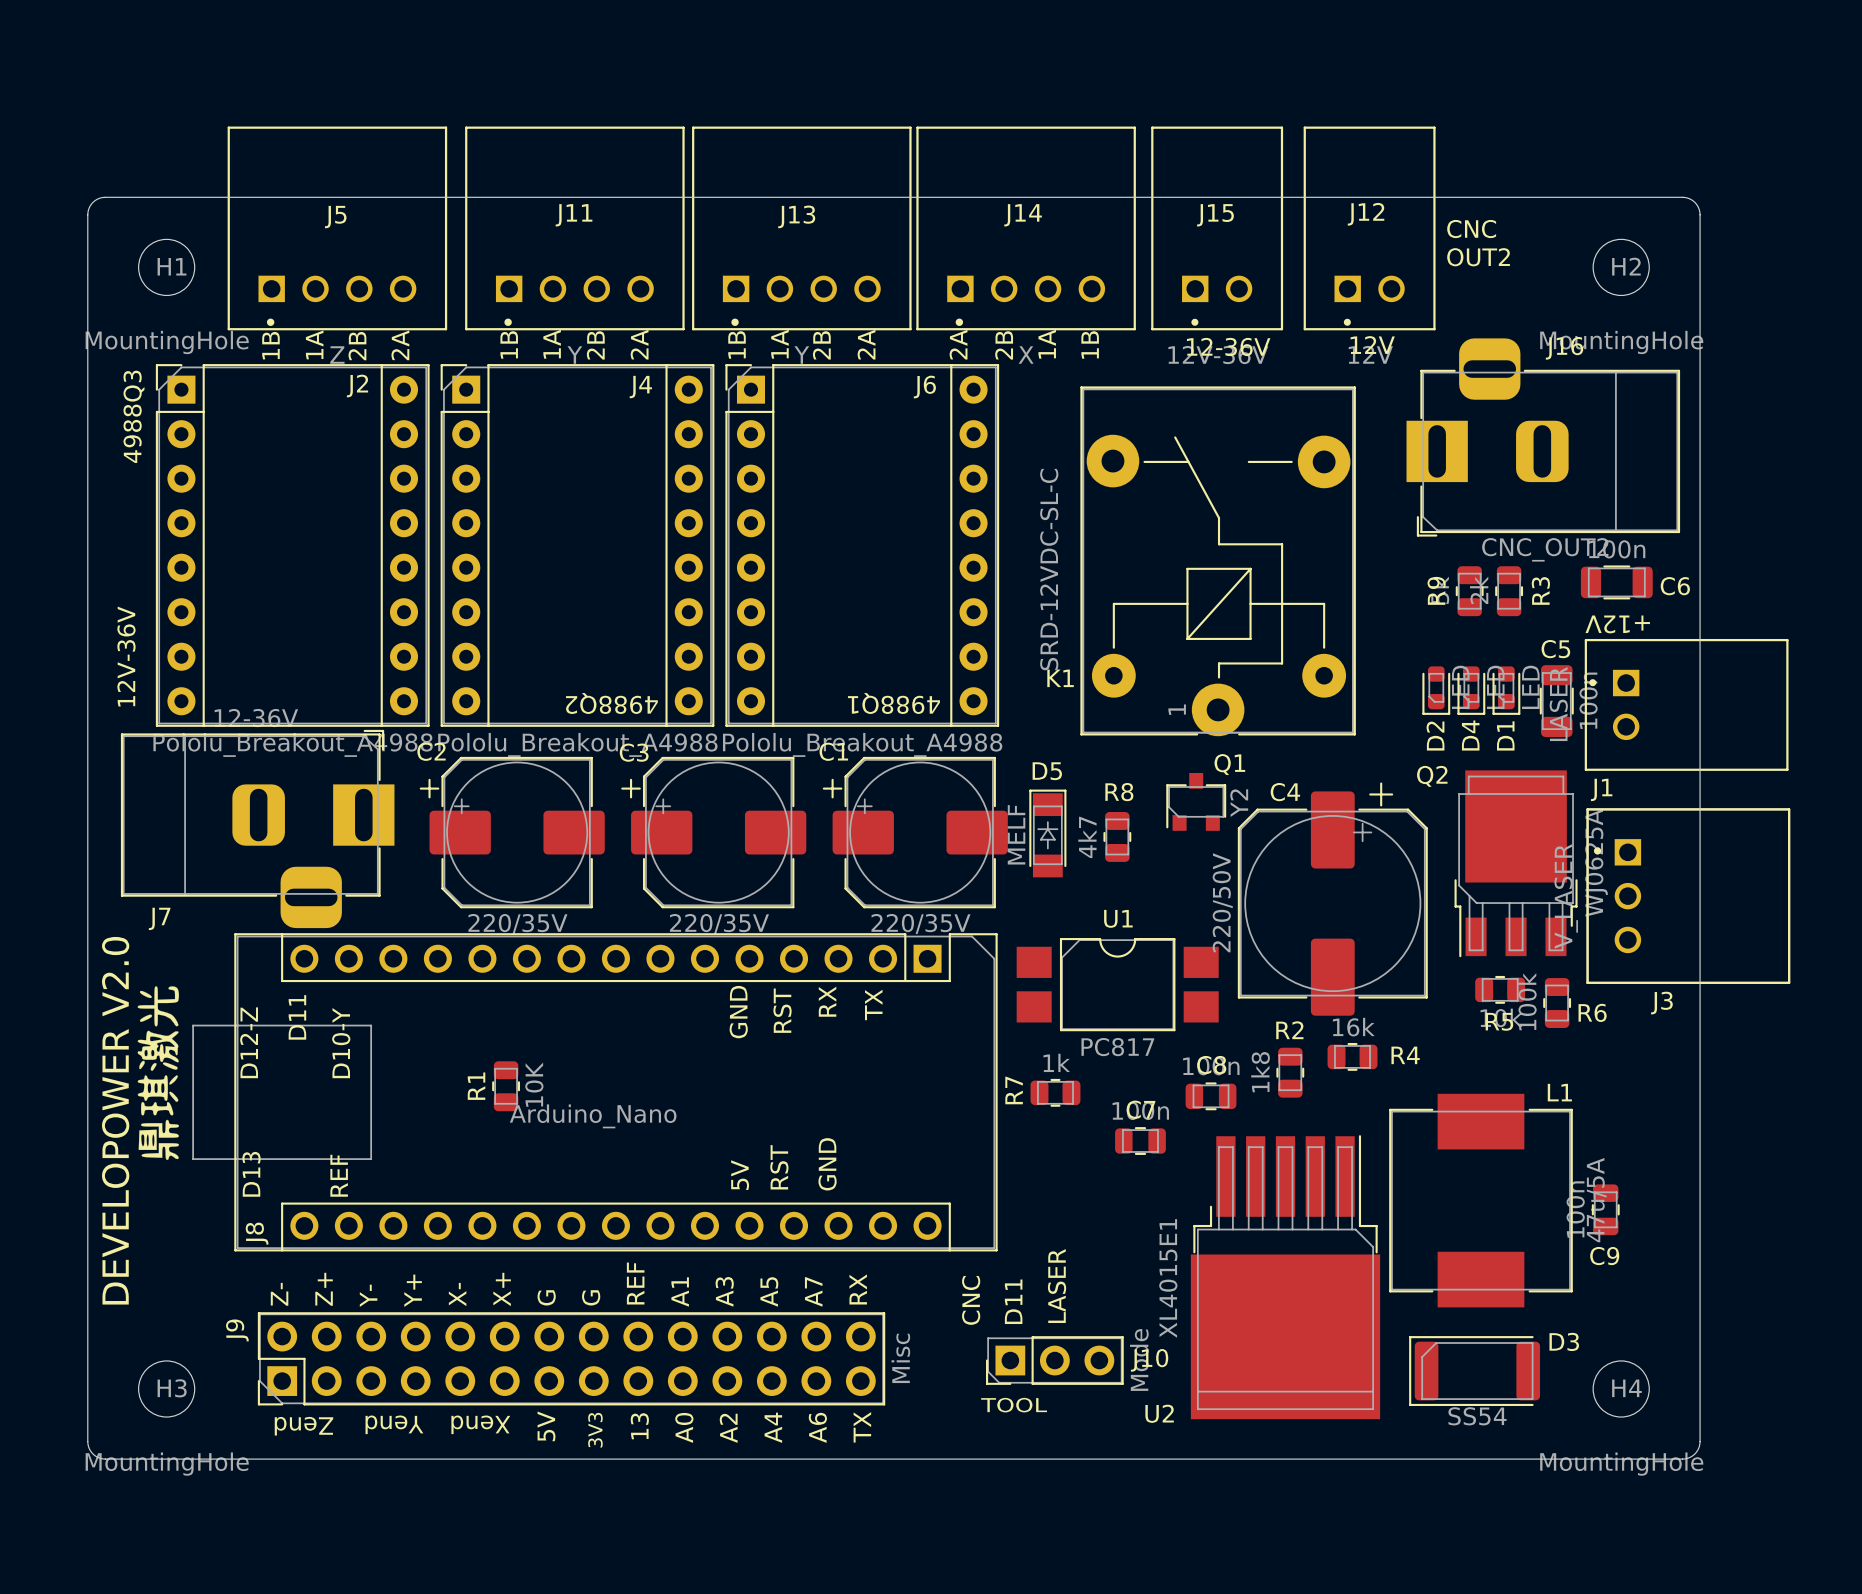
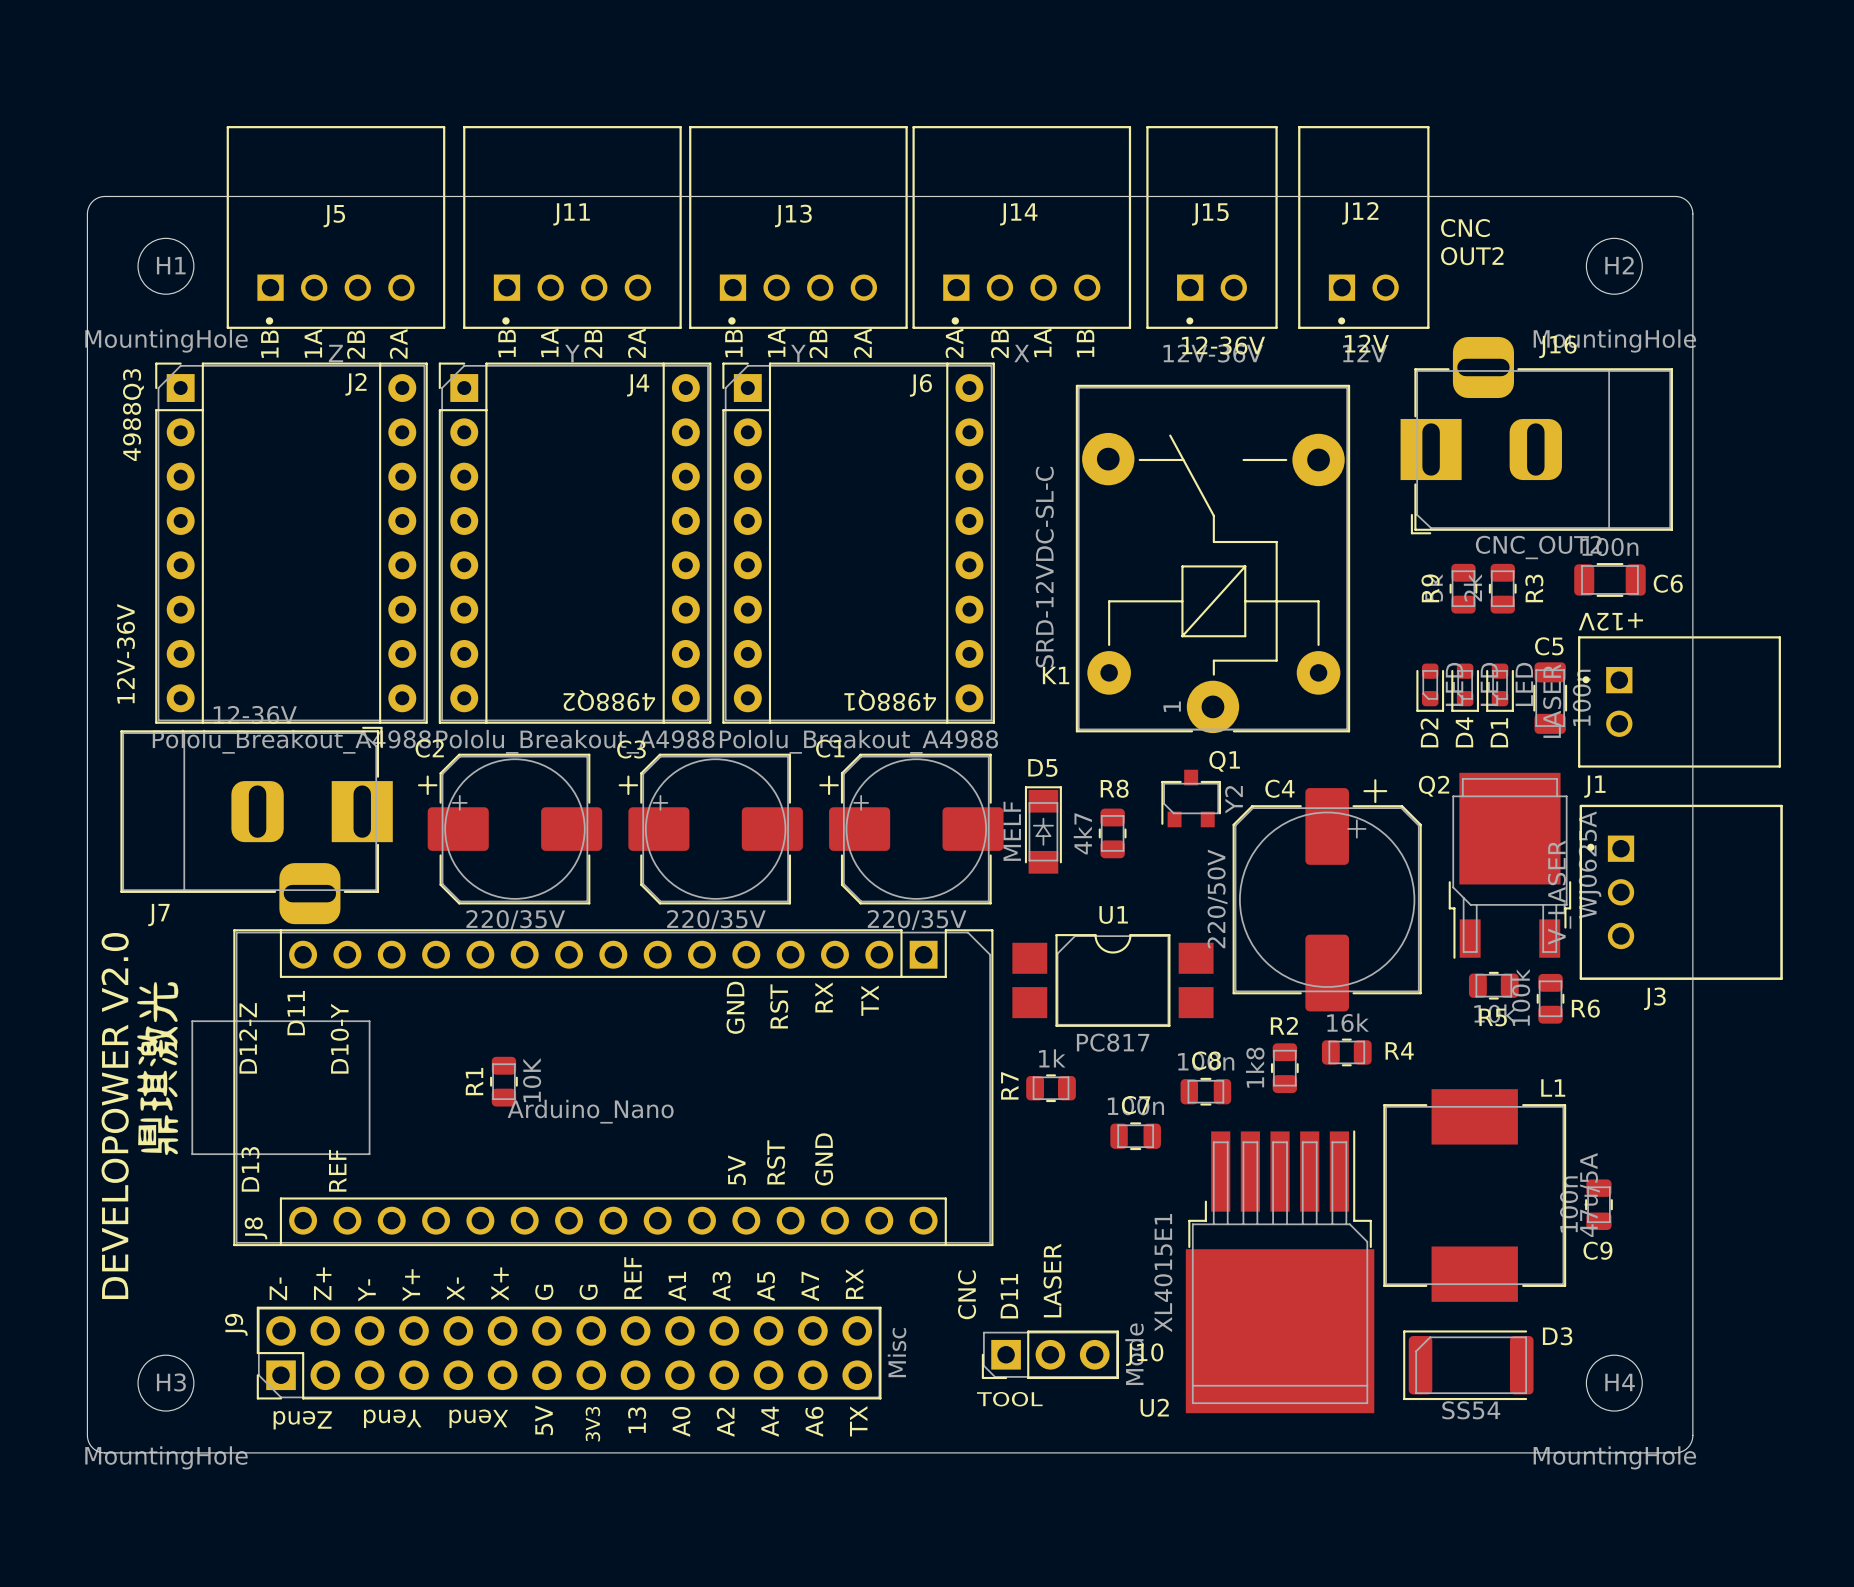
Q2 footprint: [1454, 770, 1578, 958] -> [1448, 772, 1572, 959]

